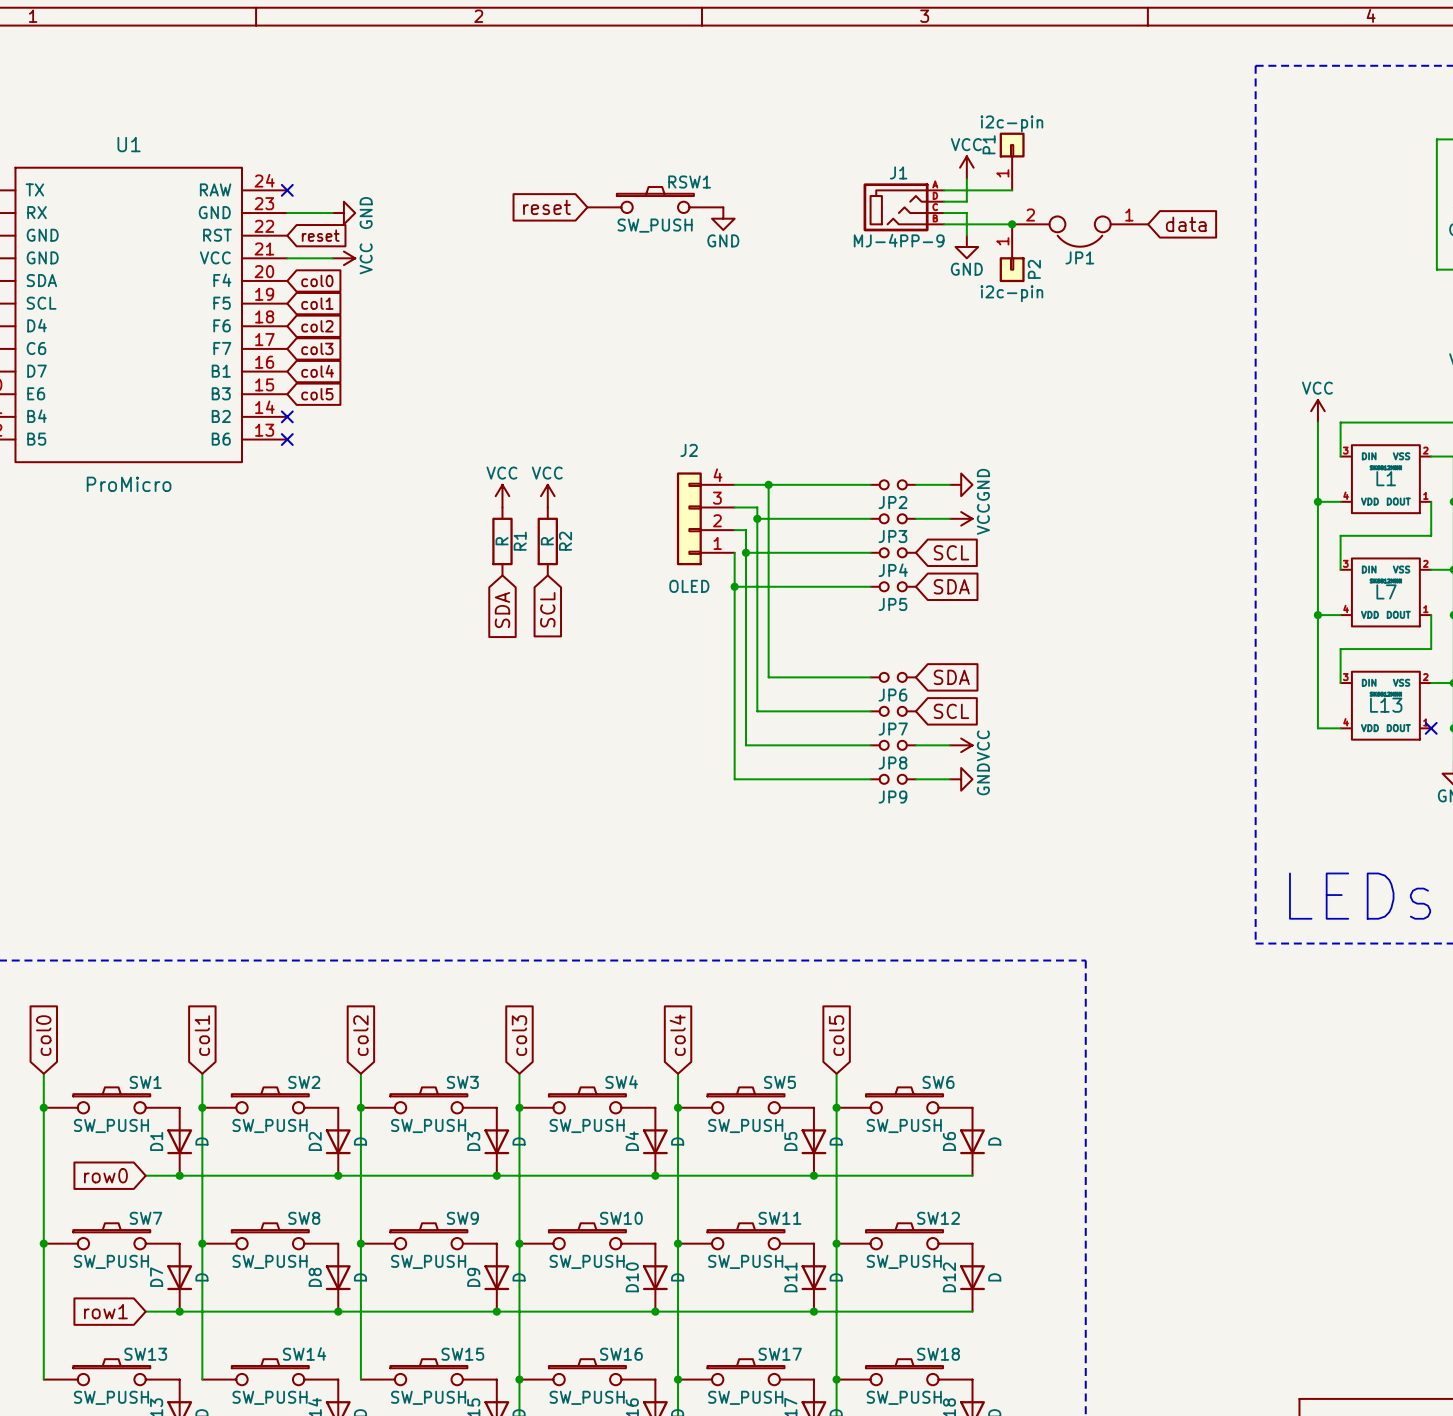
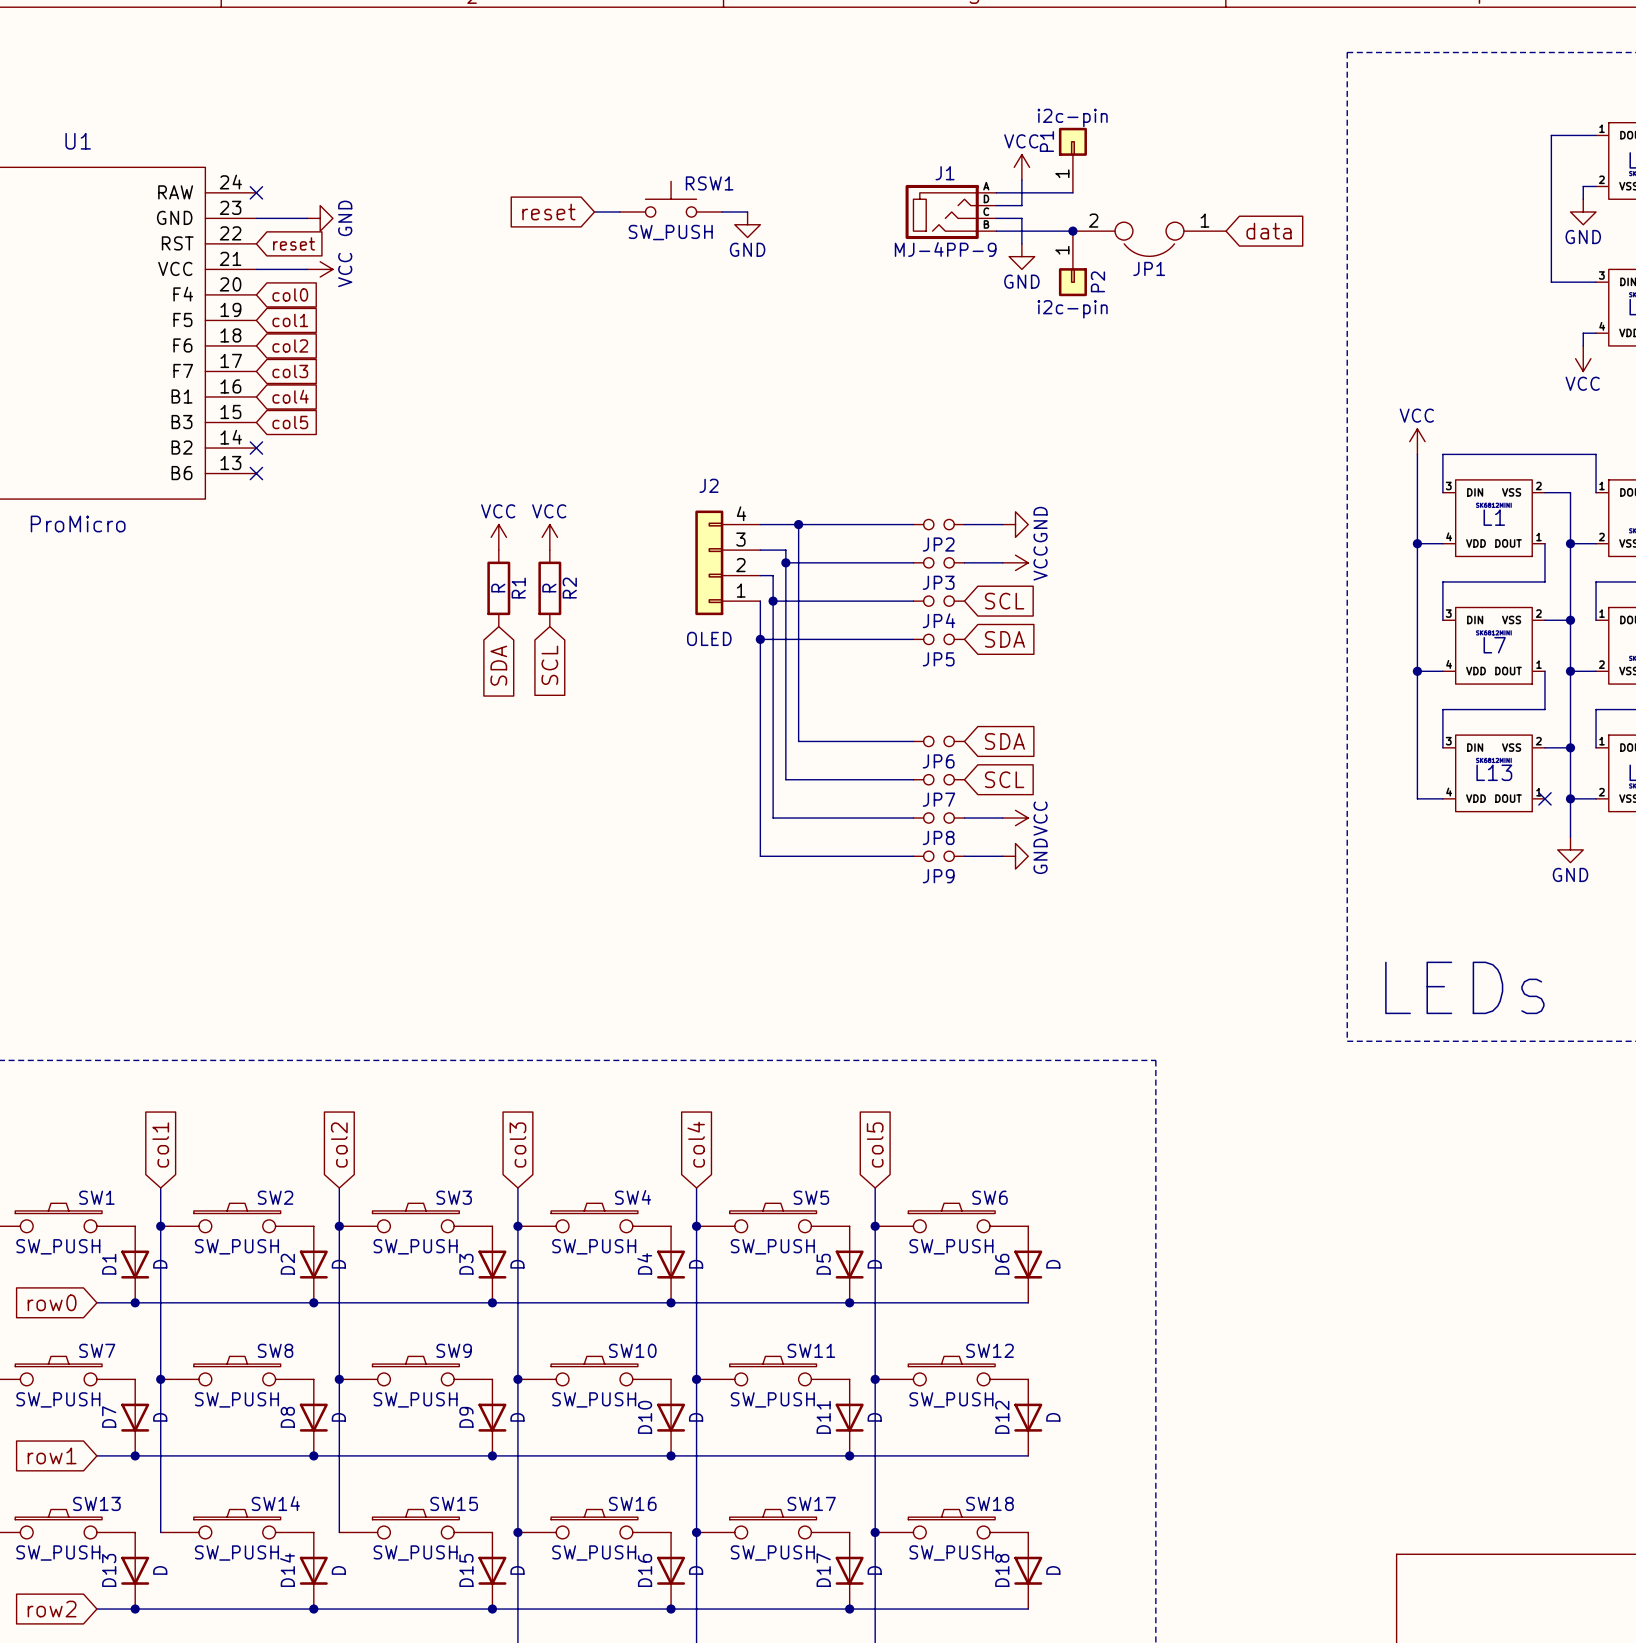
RSW1 symbol: [587, 186, 724, 214] -> [620, 181, 723, 218]

